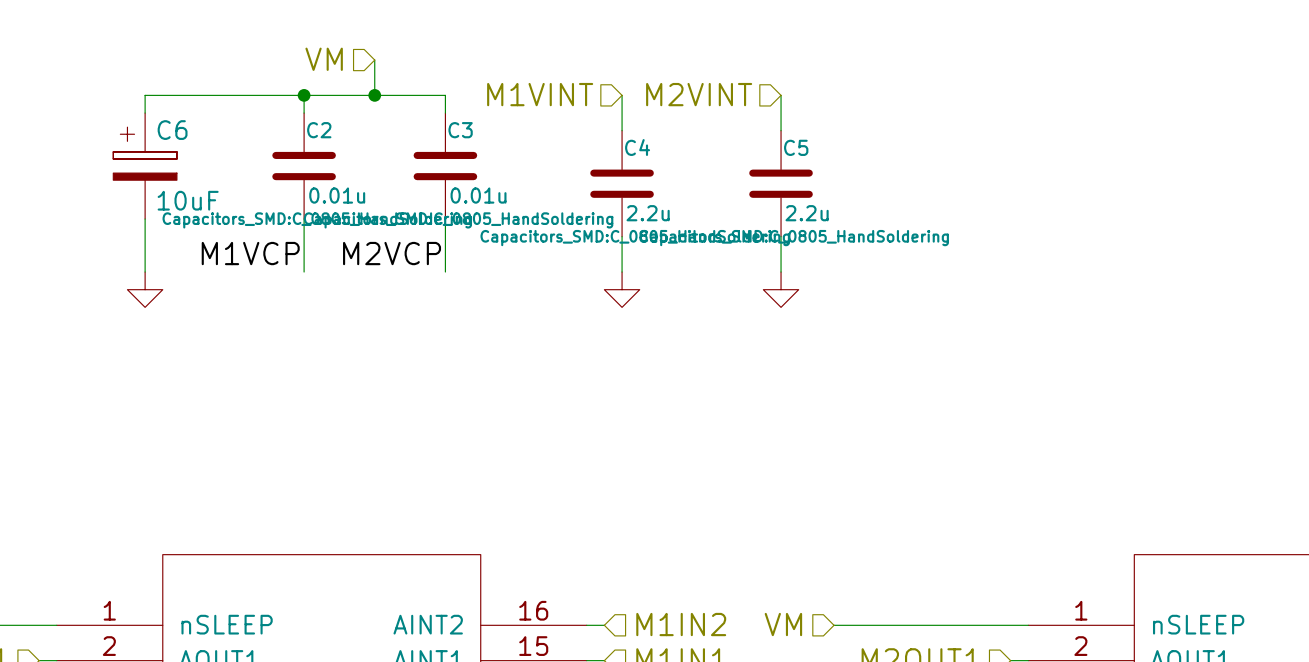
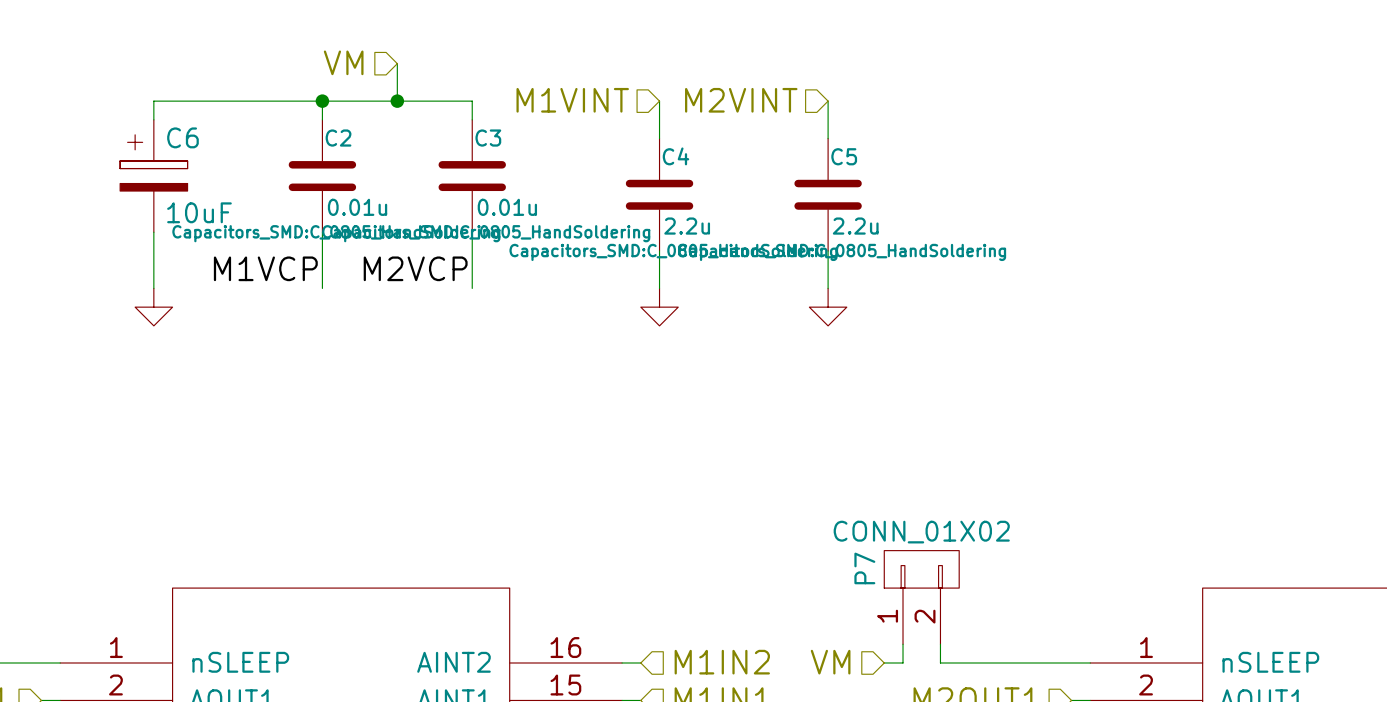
P7: none -> CONN_01X02 (921, 597)
wire: none -> (940, 644) (940, 662)
wire: (851, 625) (887, 625) -> (903, 662) (903, 644)

